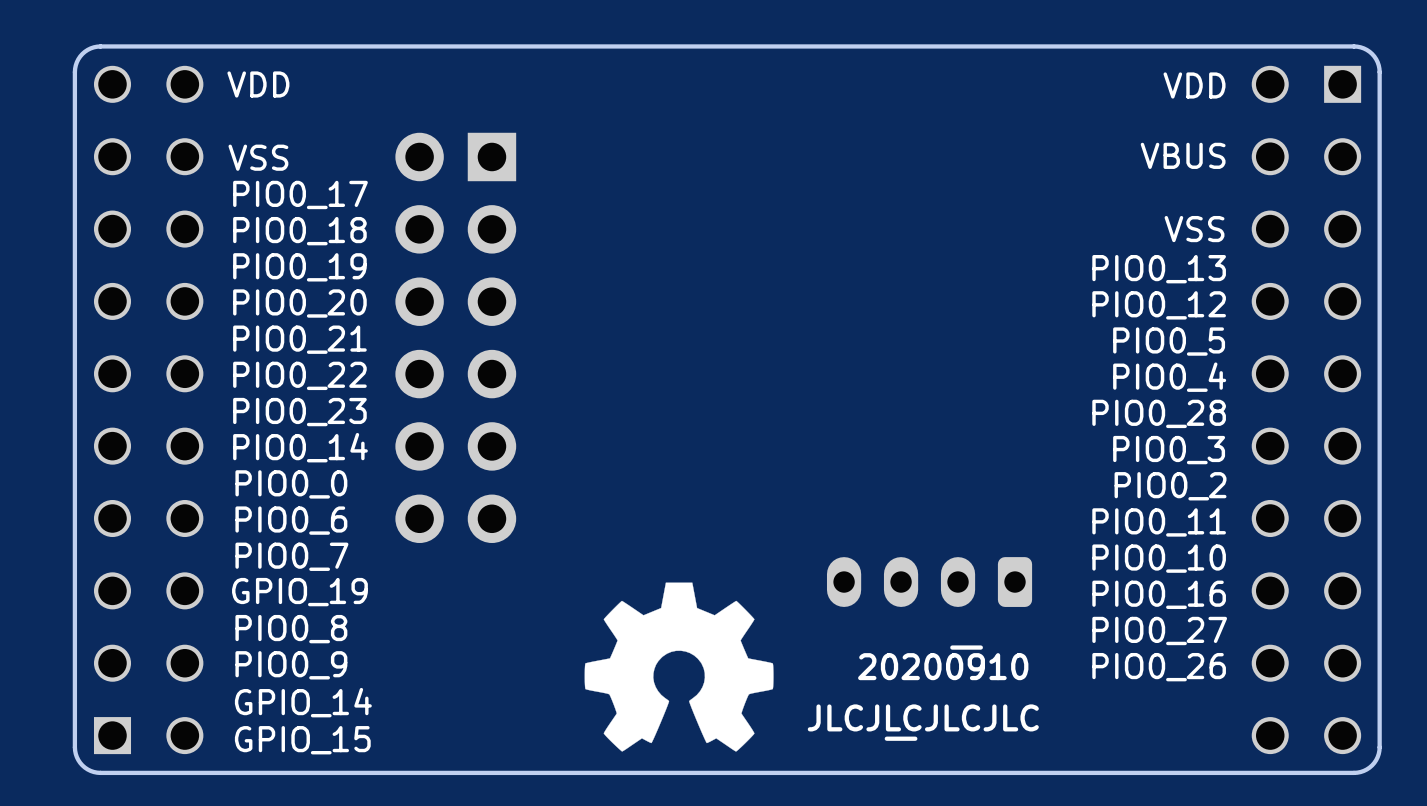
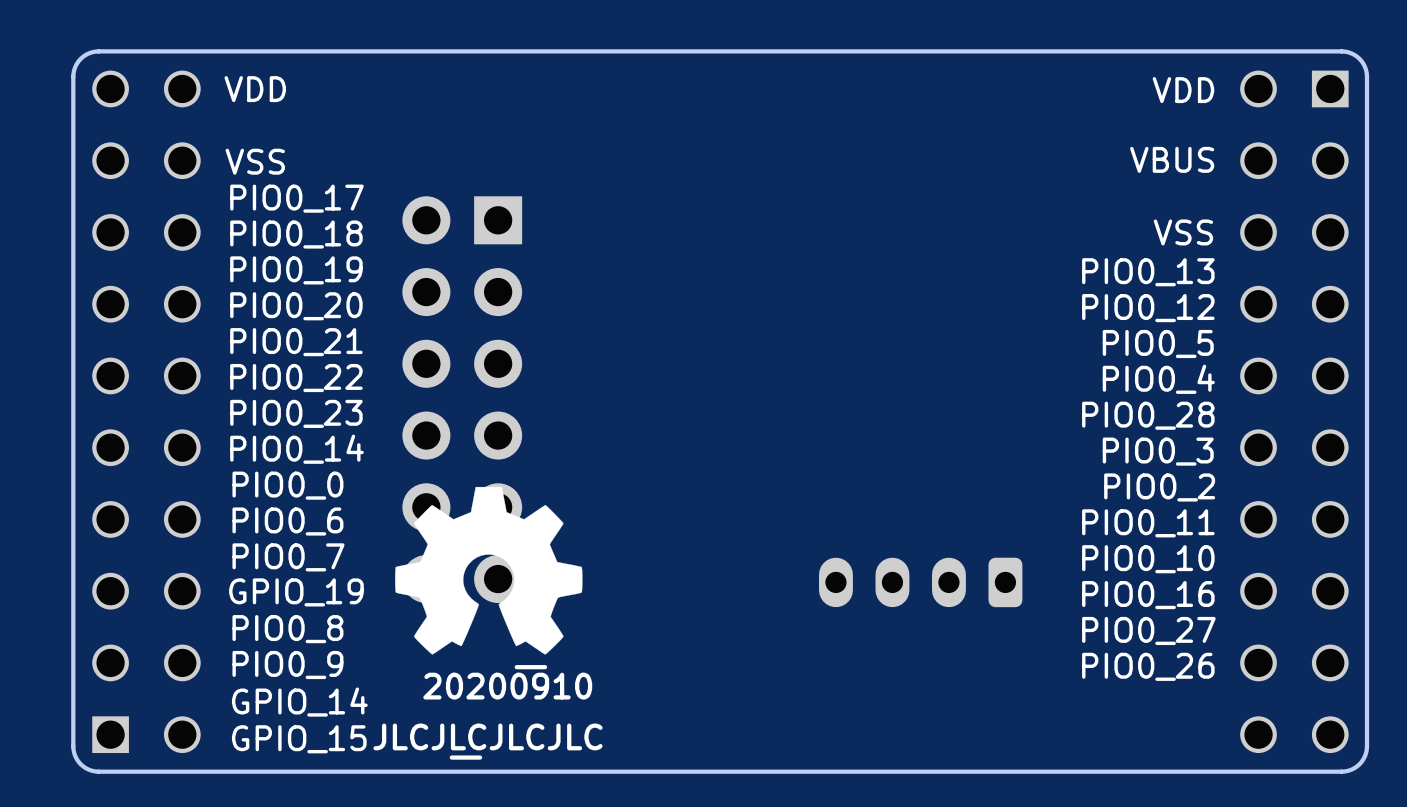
part position: (455, 337) -> (462, 399)
drawing position: (966, 647) -> (530, 667)
drawing position: (679, 667) -> (488, 570)
drawing position: (901, 738) -> (465, 757)

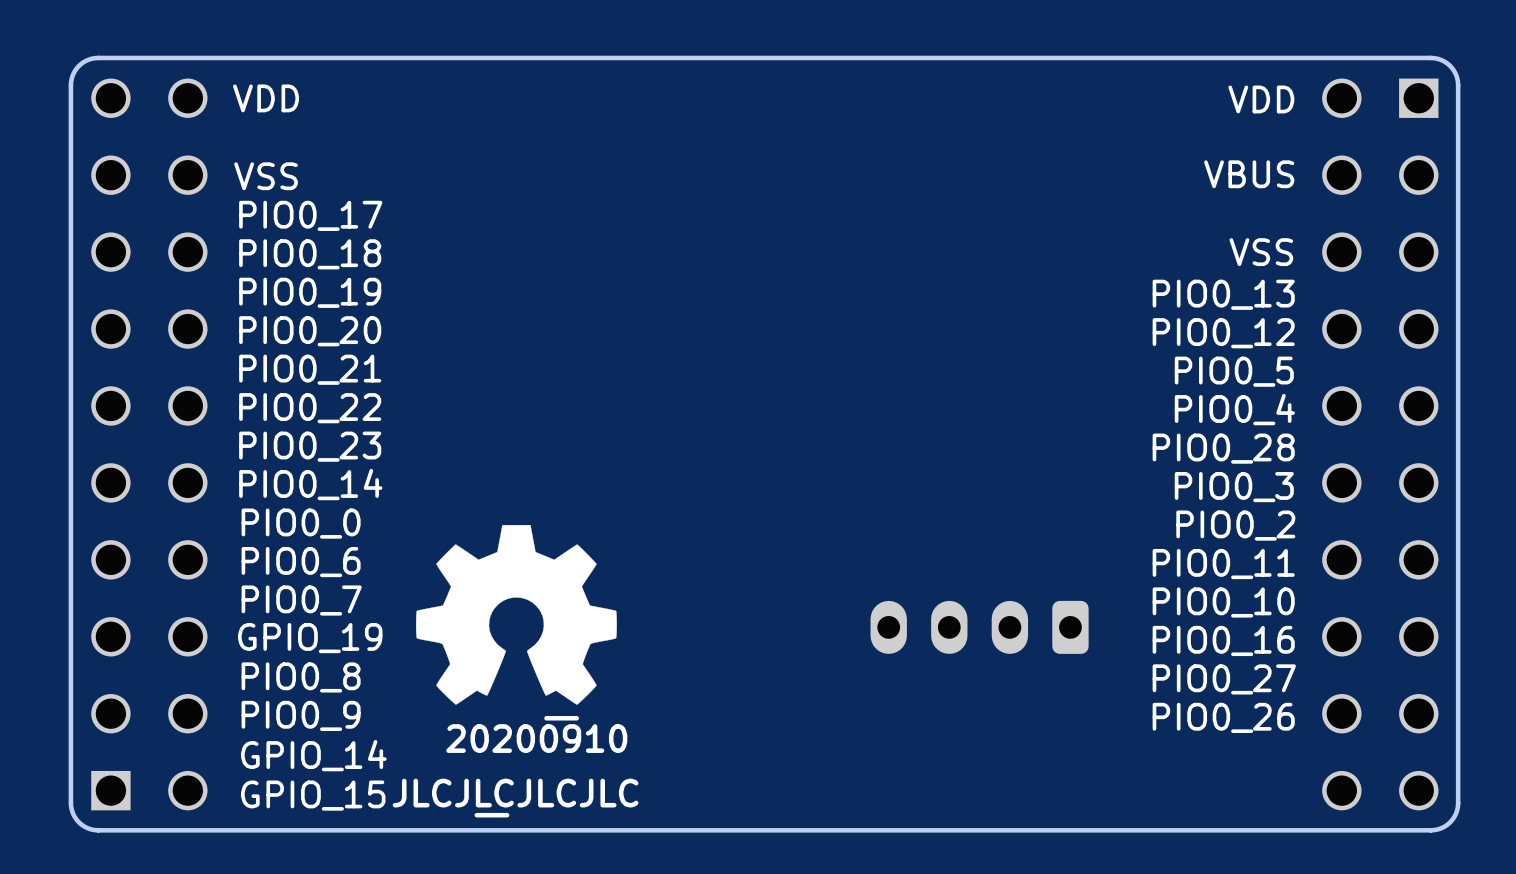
part: (462, 399) -> none

